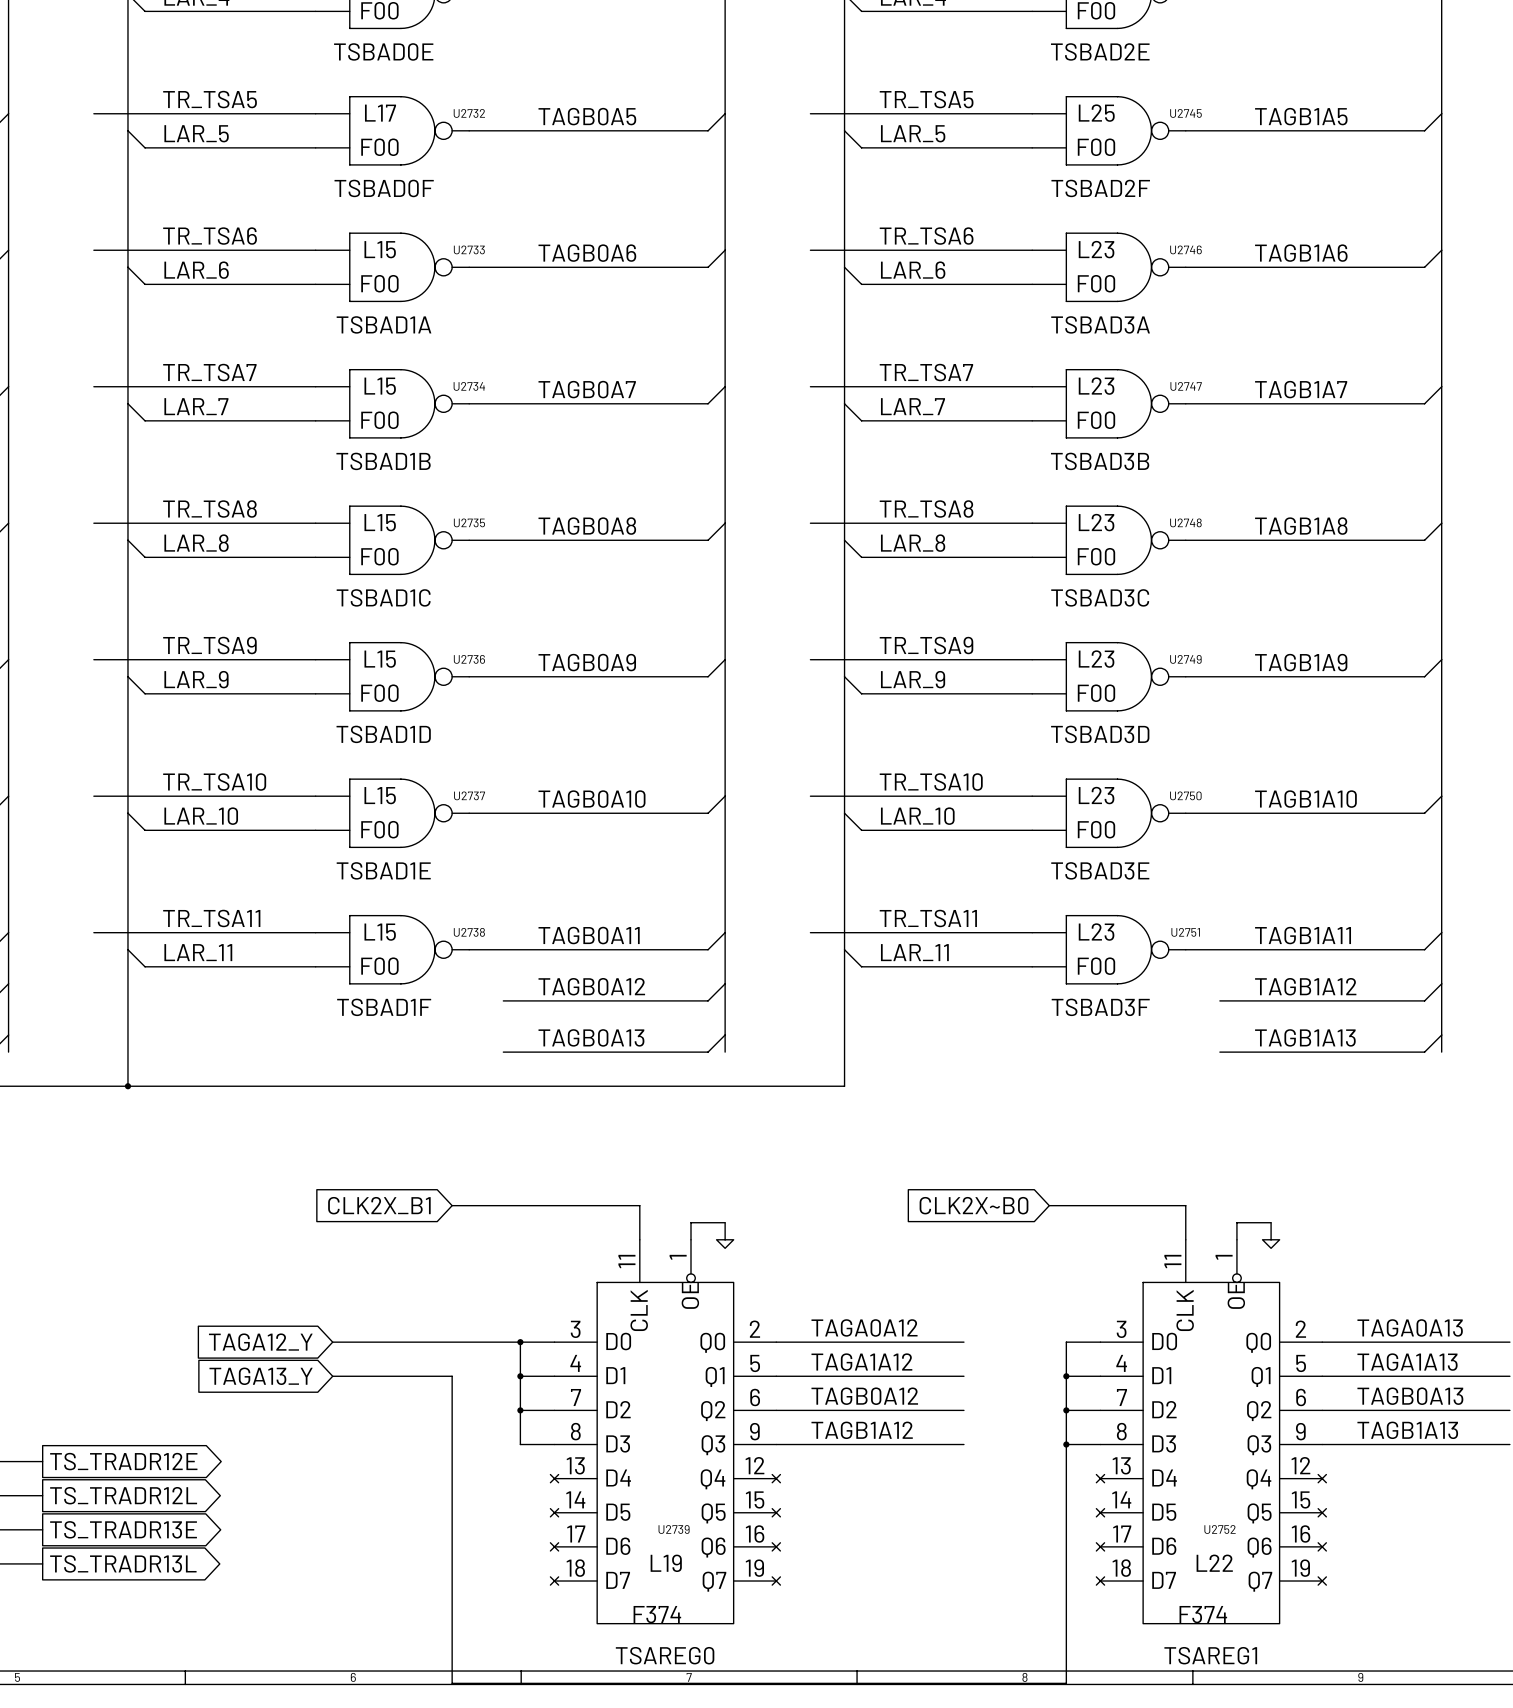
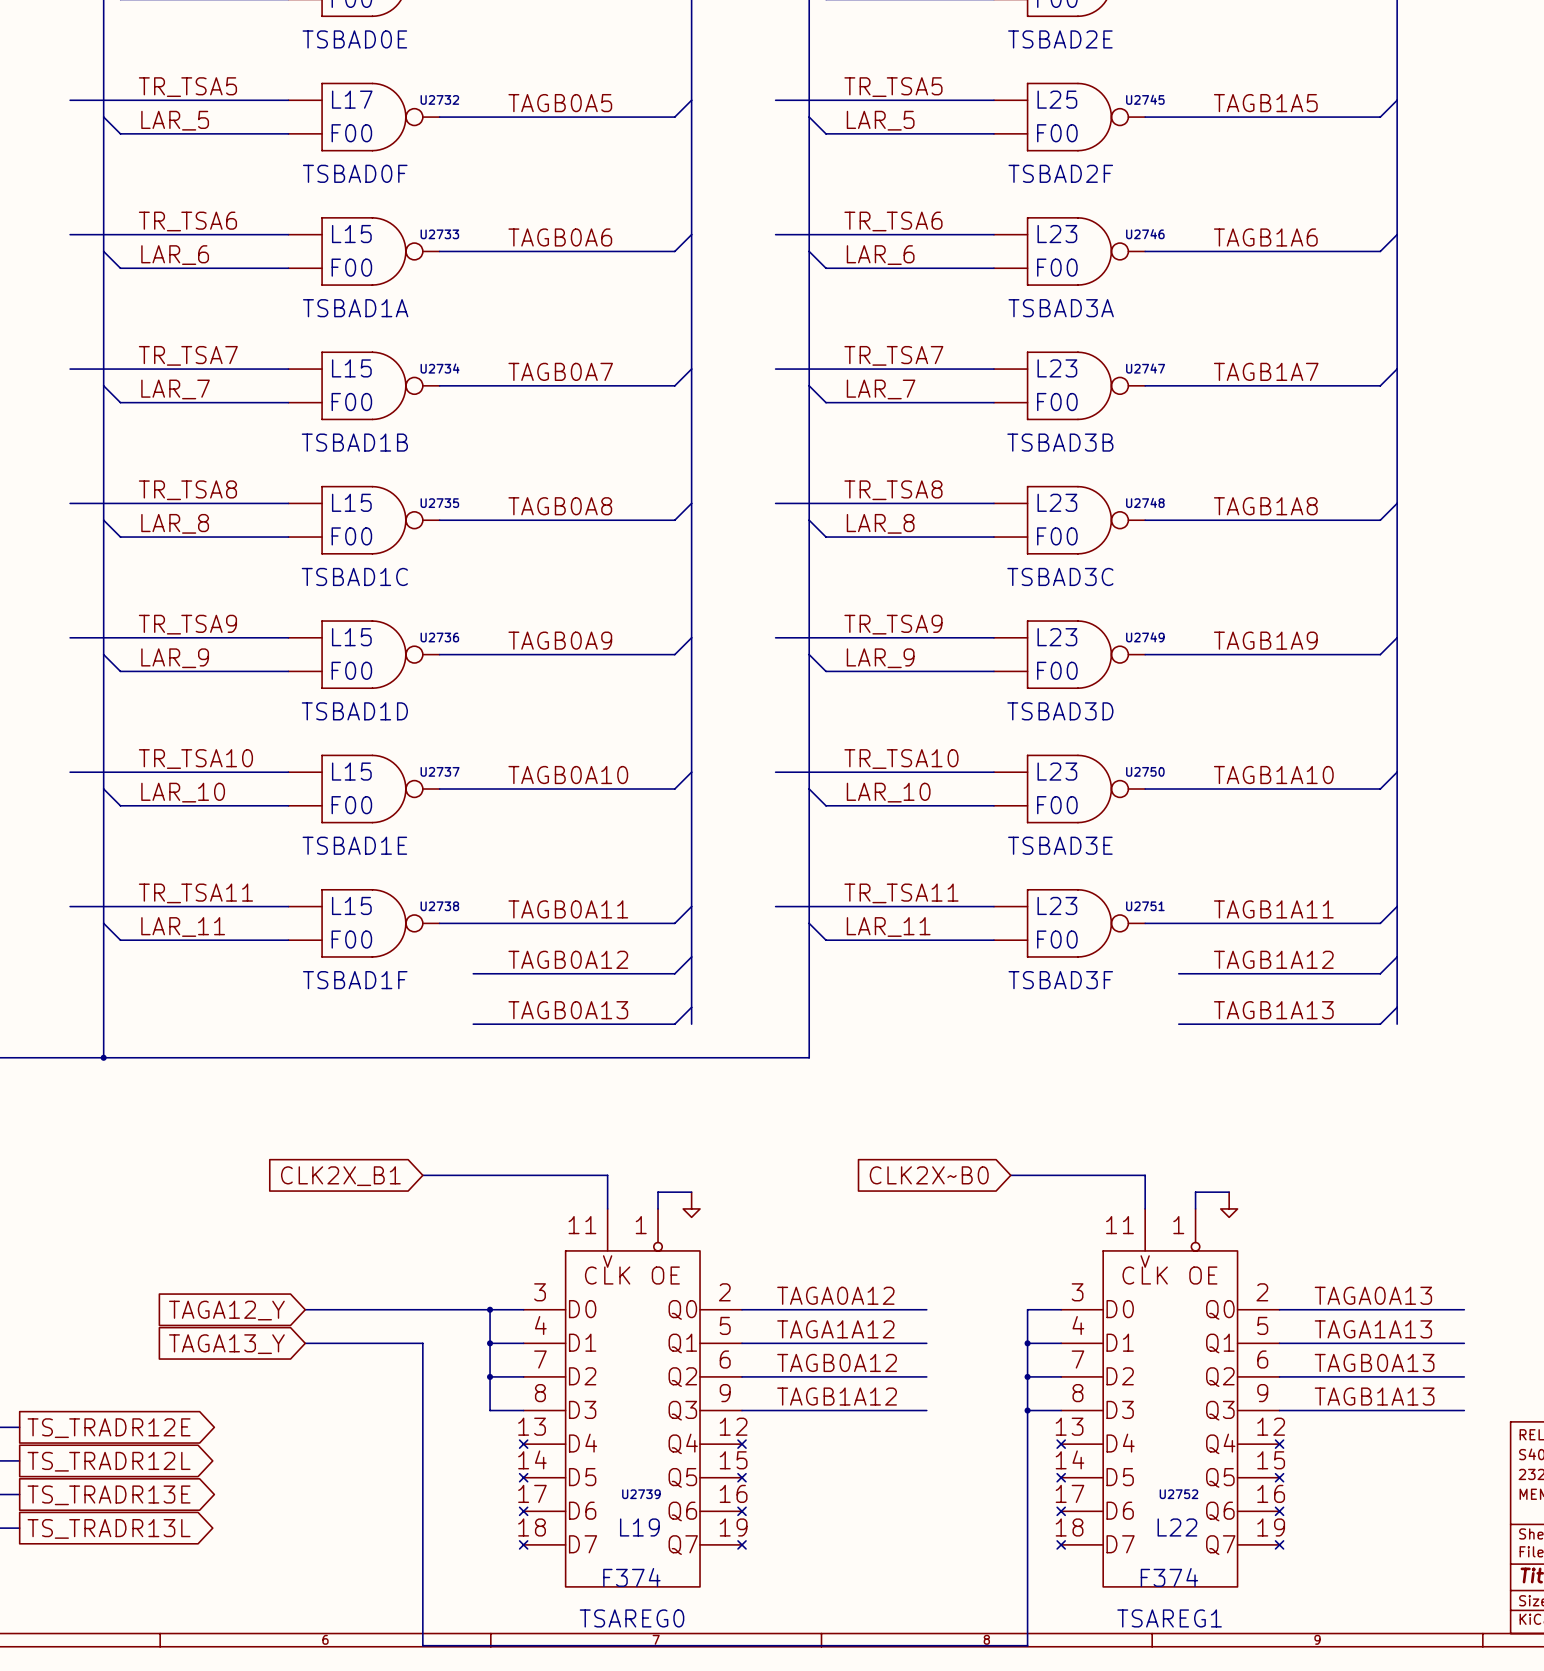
U2739 symbol: [554, 1239, 777, 1624] -> [523, 1208, 743, 1587]
U2752 symbol: [1100, 1239, 1323, 1624] -> [1061, 1208, 1280, 1587]

